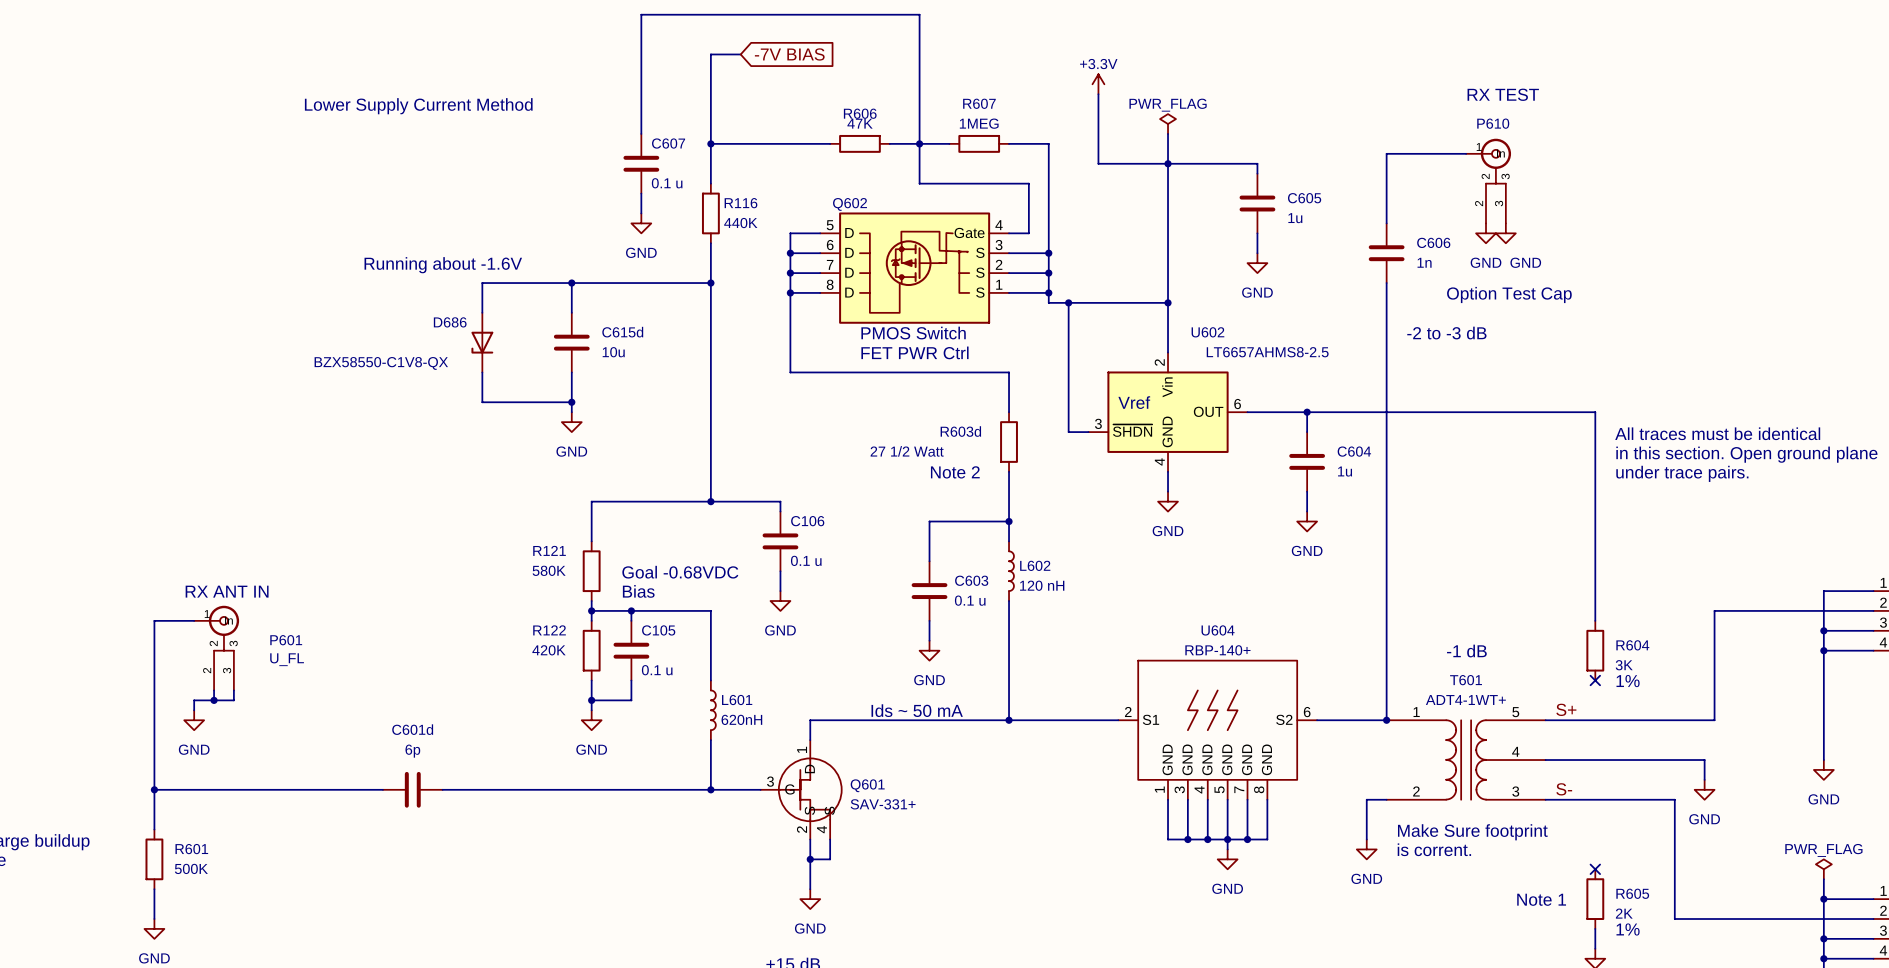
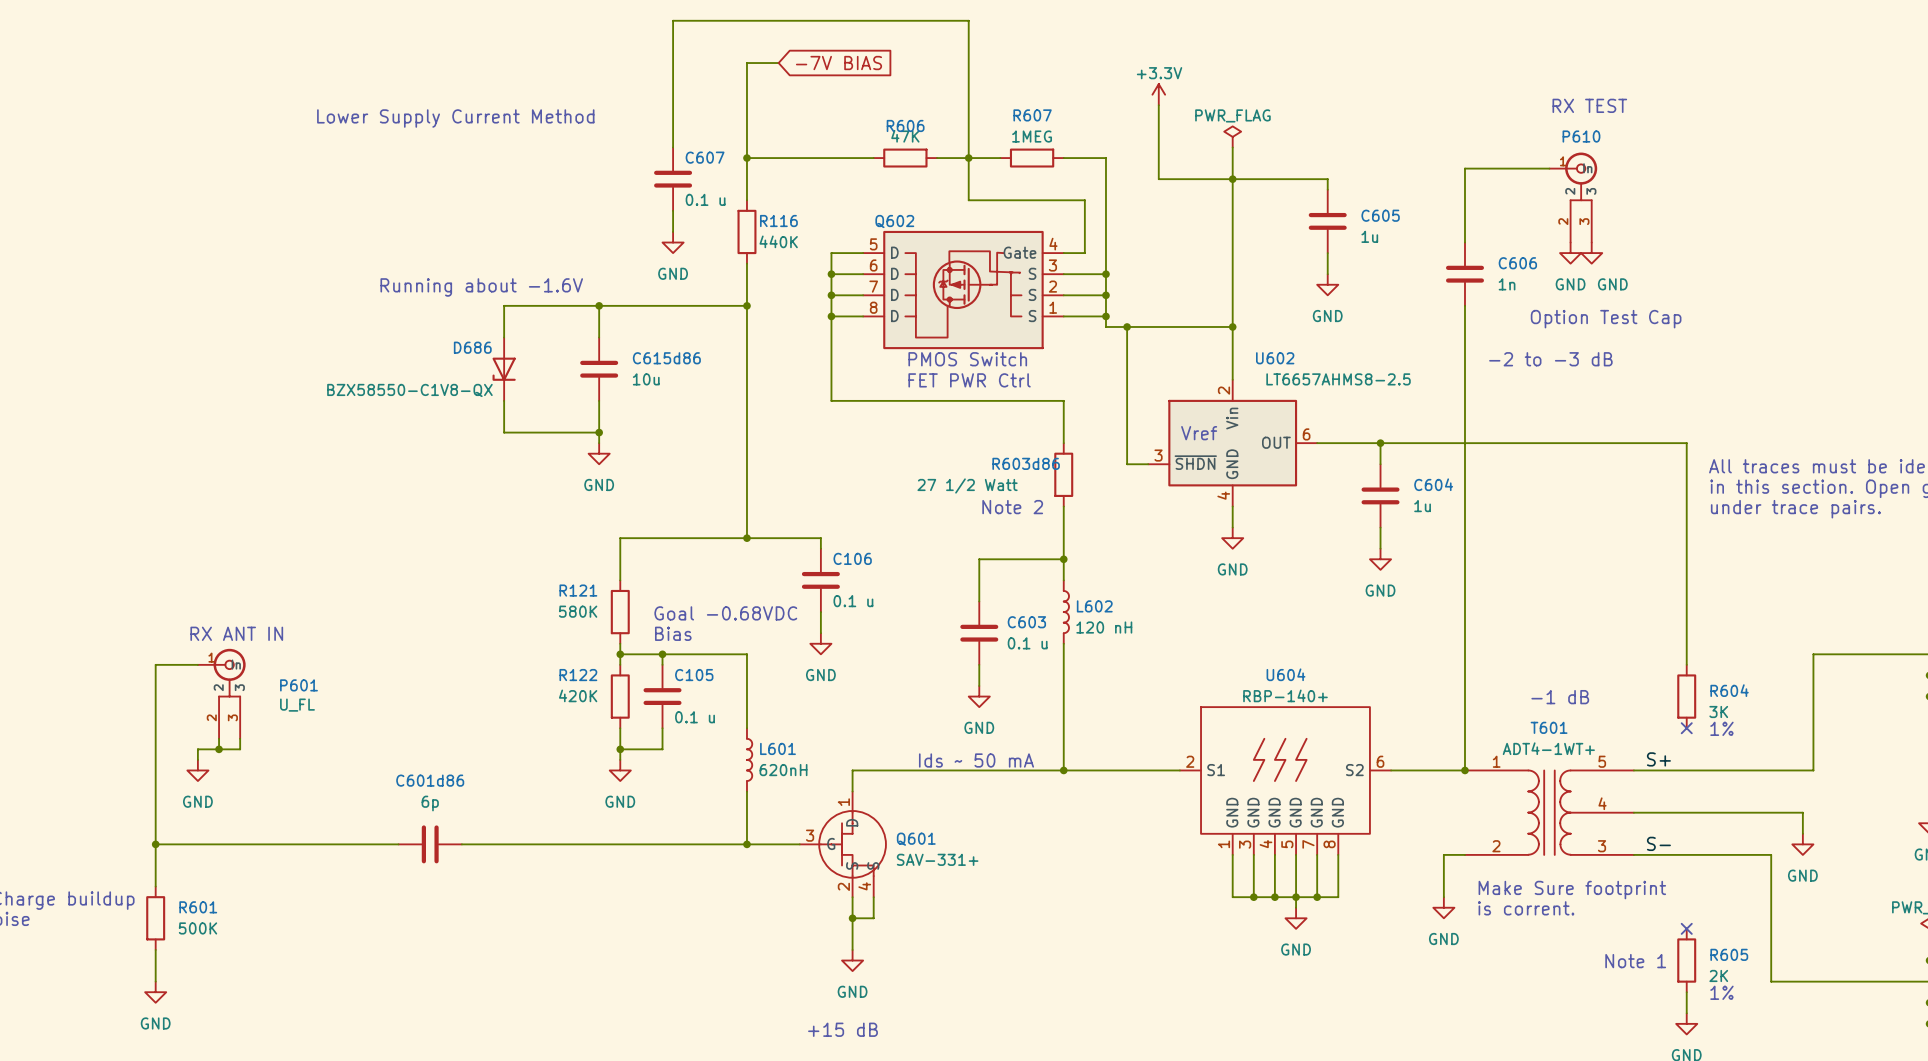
C615d name: C615d (622, 332) -> C615d86 (666, 358)
R603d name: R603d (960, 431) -> R603d86 (1026, 463)
C601d name: C601d (412, 729) -> C601d86 (430, 780)

